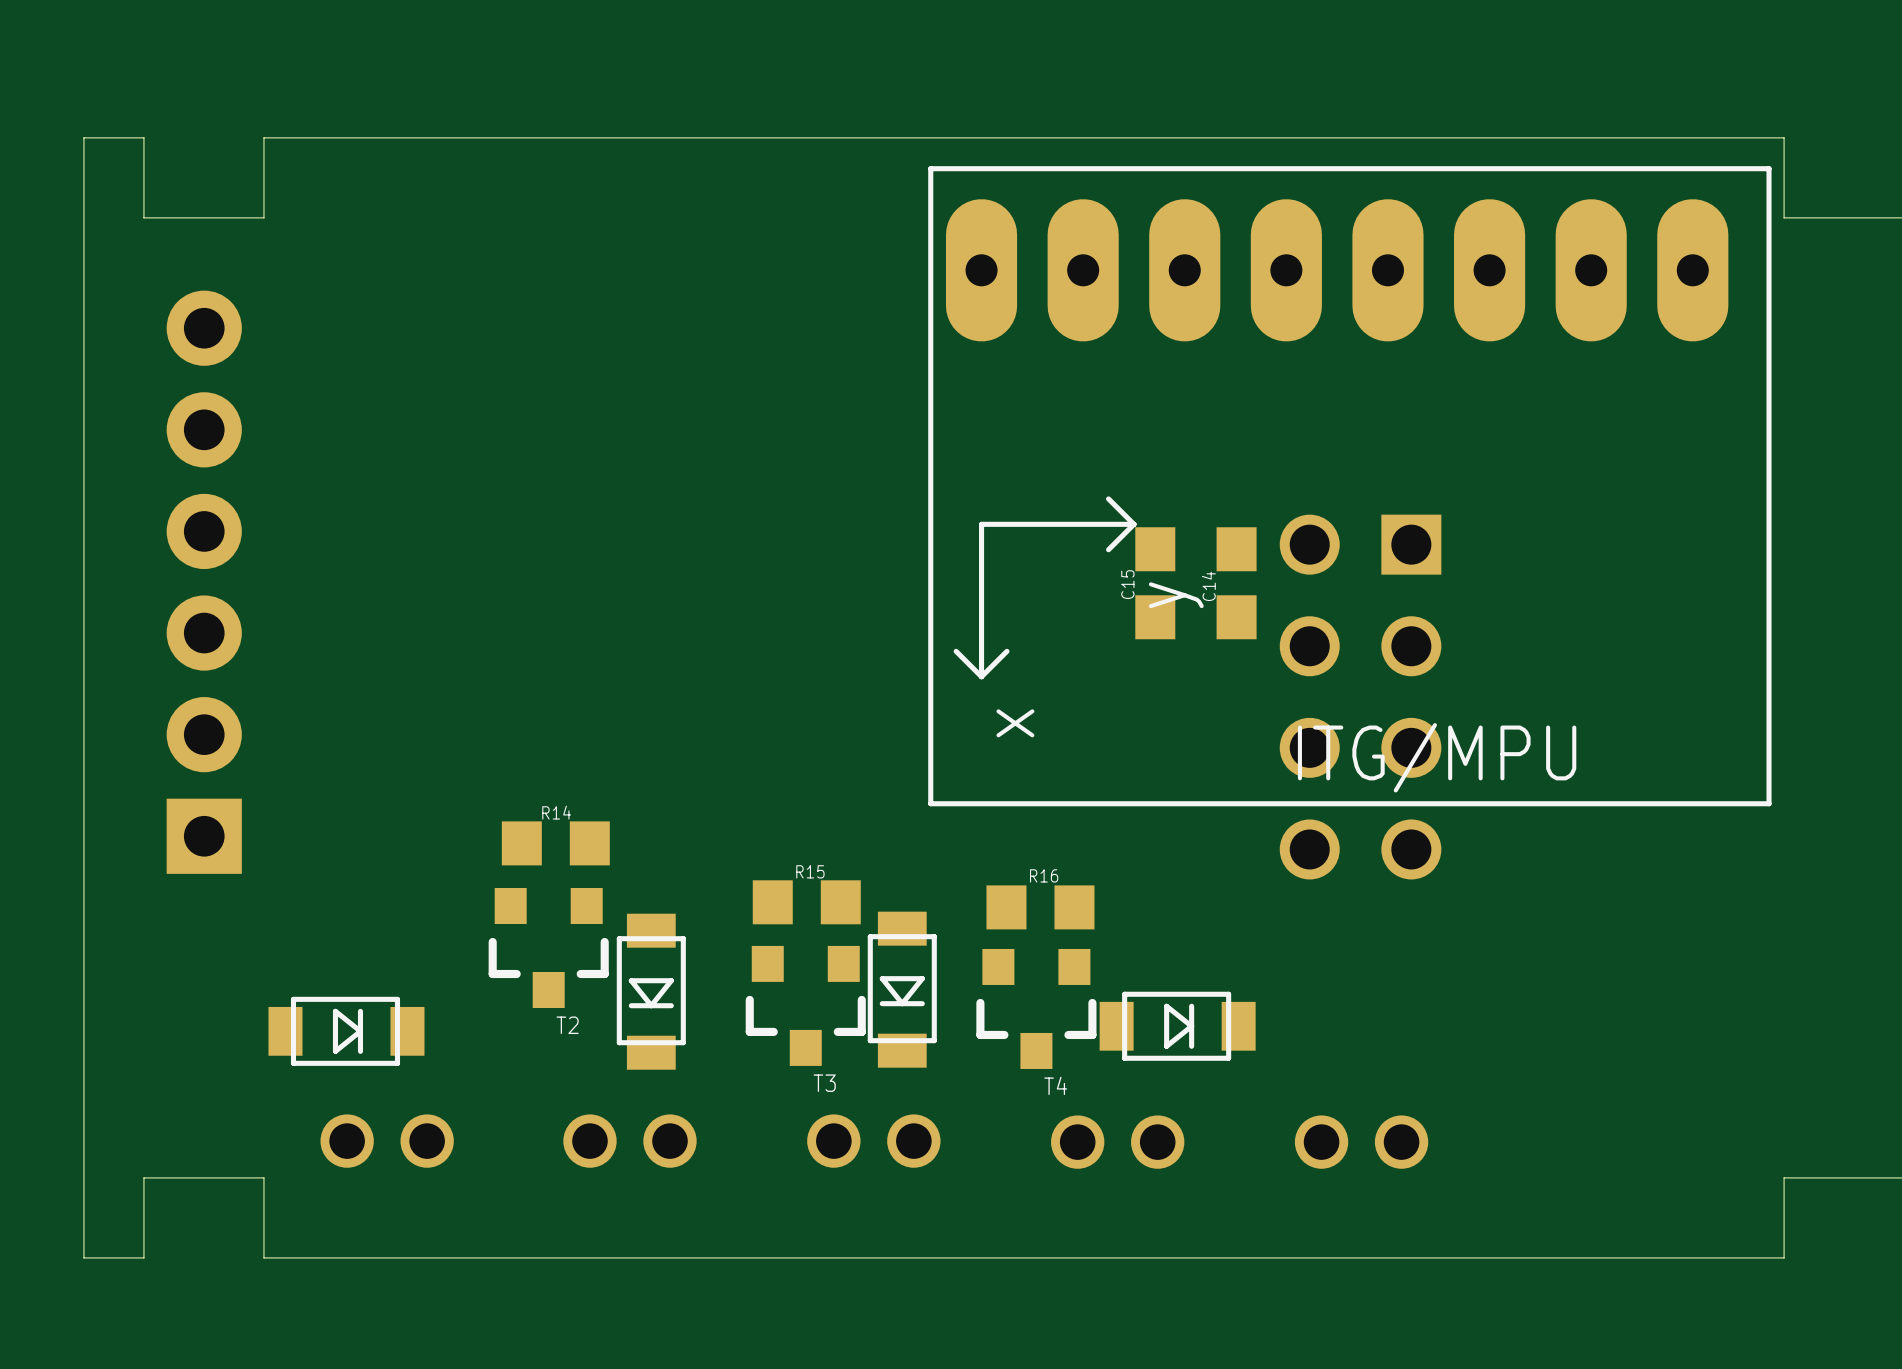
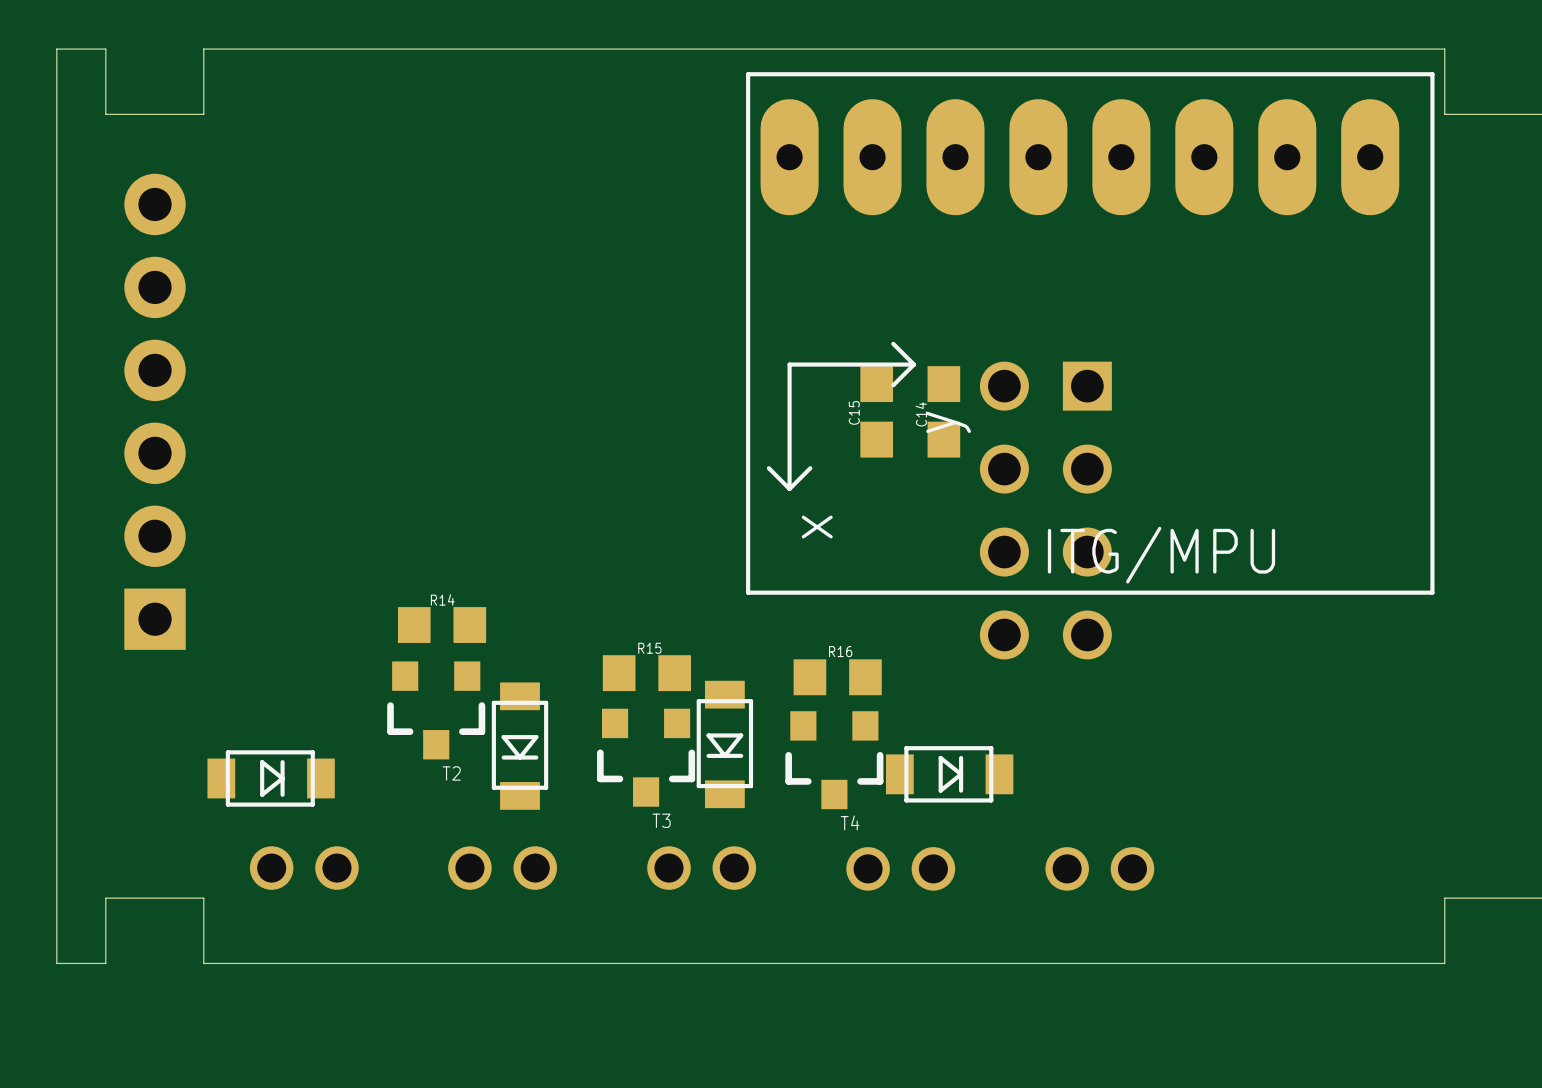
C15 position: (1155, 583) -> (876, 411)
C14 position: (1236, 583) -> (943, 411)
part position: (1360, 697) -> (1045, 510)

